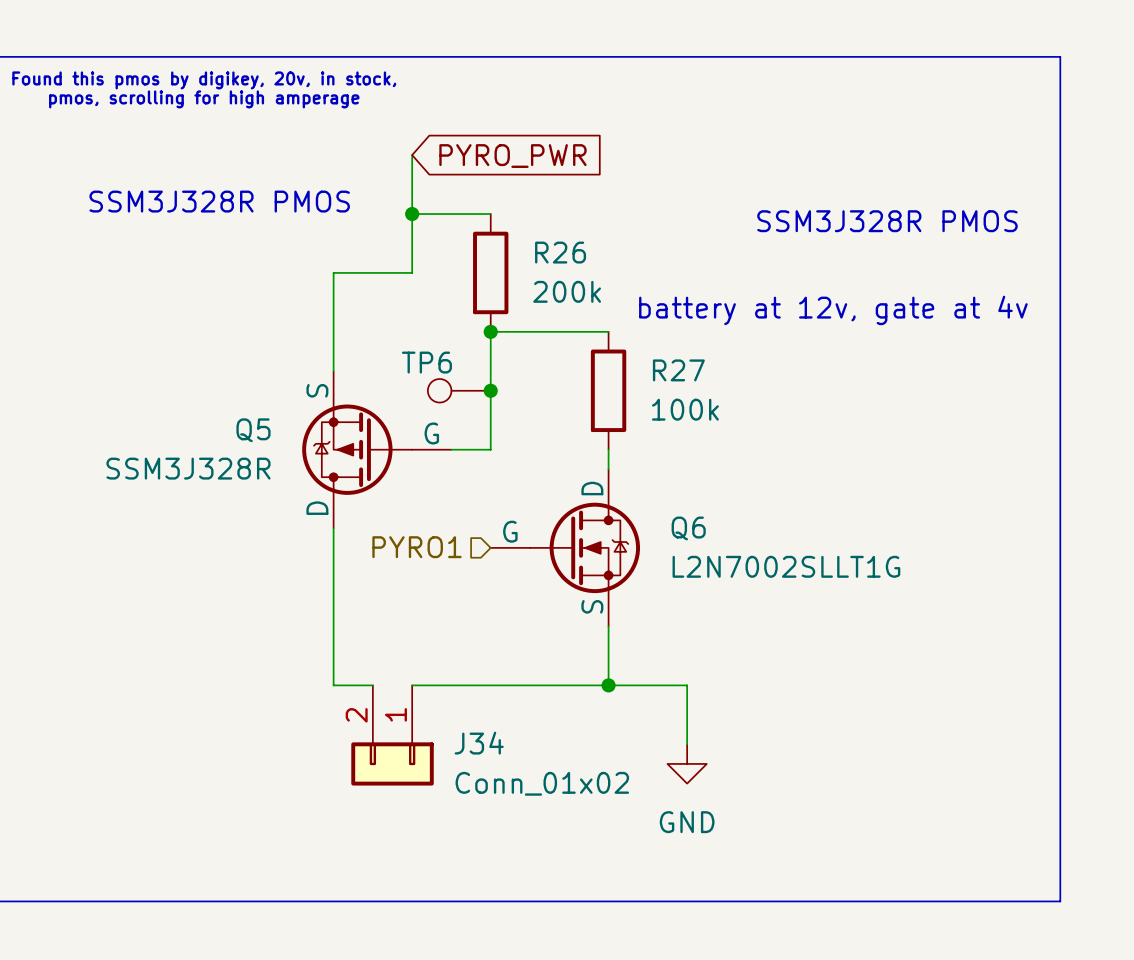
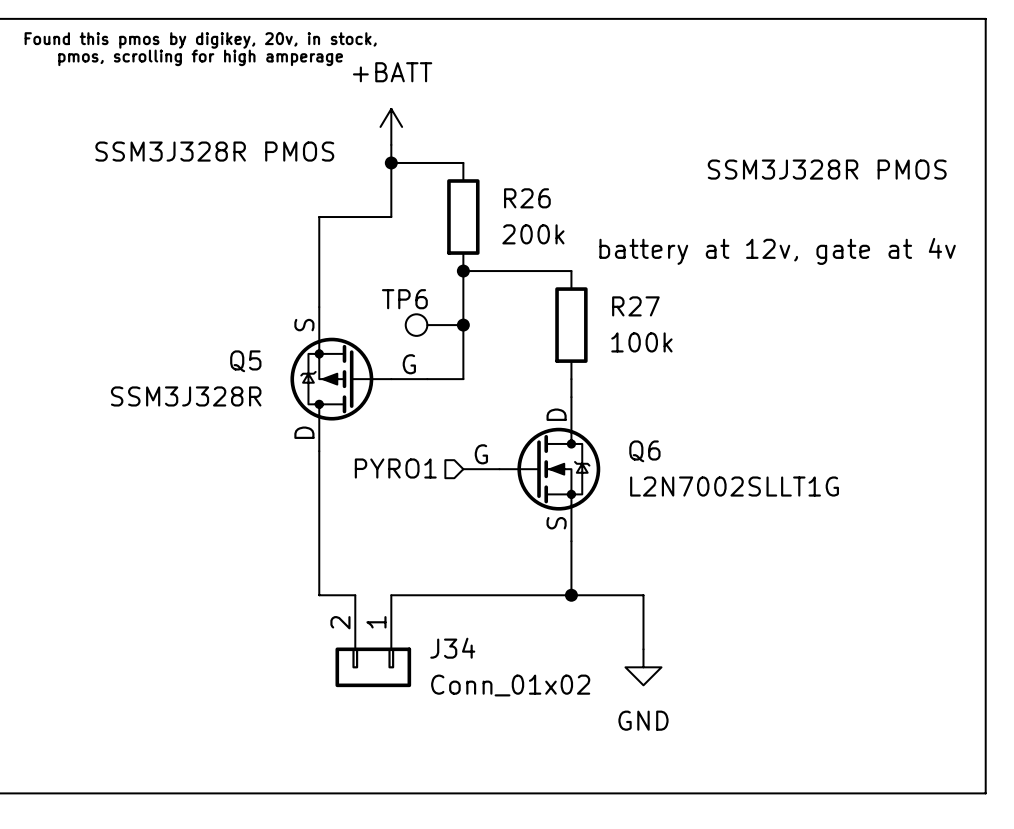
global label: PYRO_PWR (512, 156) -> none
power symbol: none -> +BATT (391, 126)

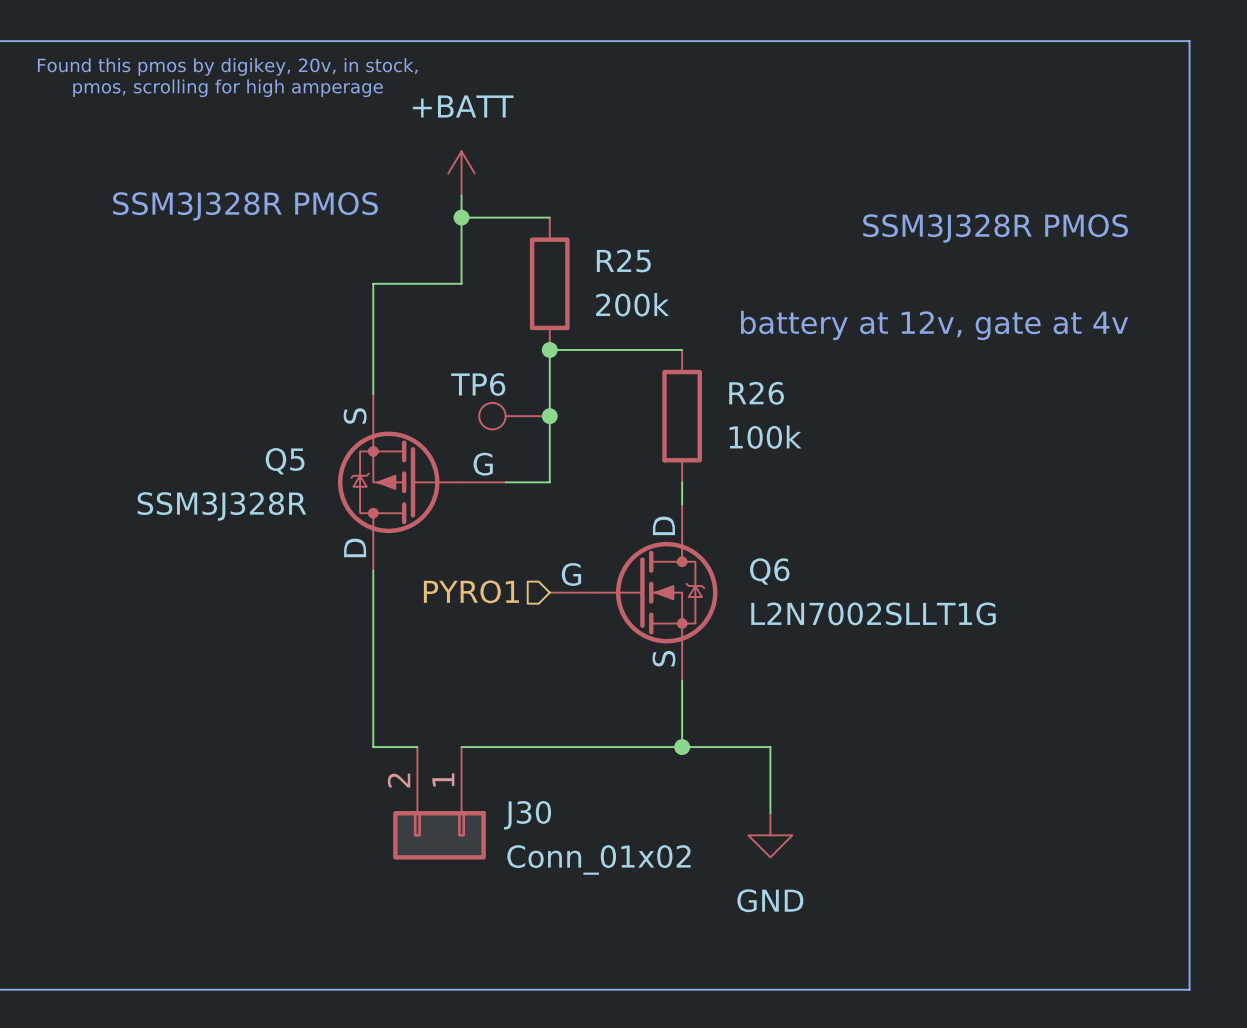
R26 name: R26 (527, 198) -> R25 (623, 260)
R27 name: R27 (635, 306) -> R26 (756, 393)
J34 name: J34 (452, 648) -> J30 (527, 815)

